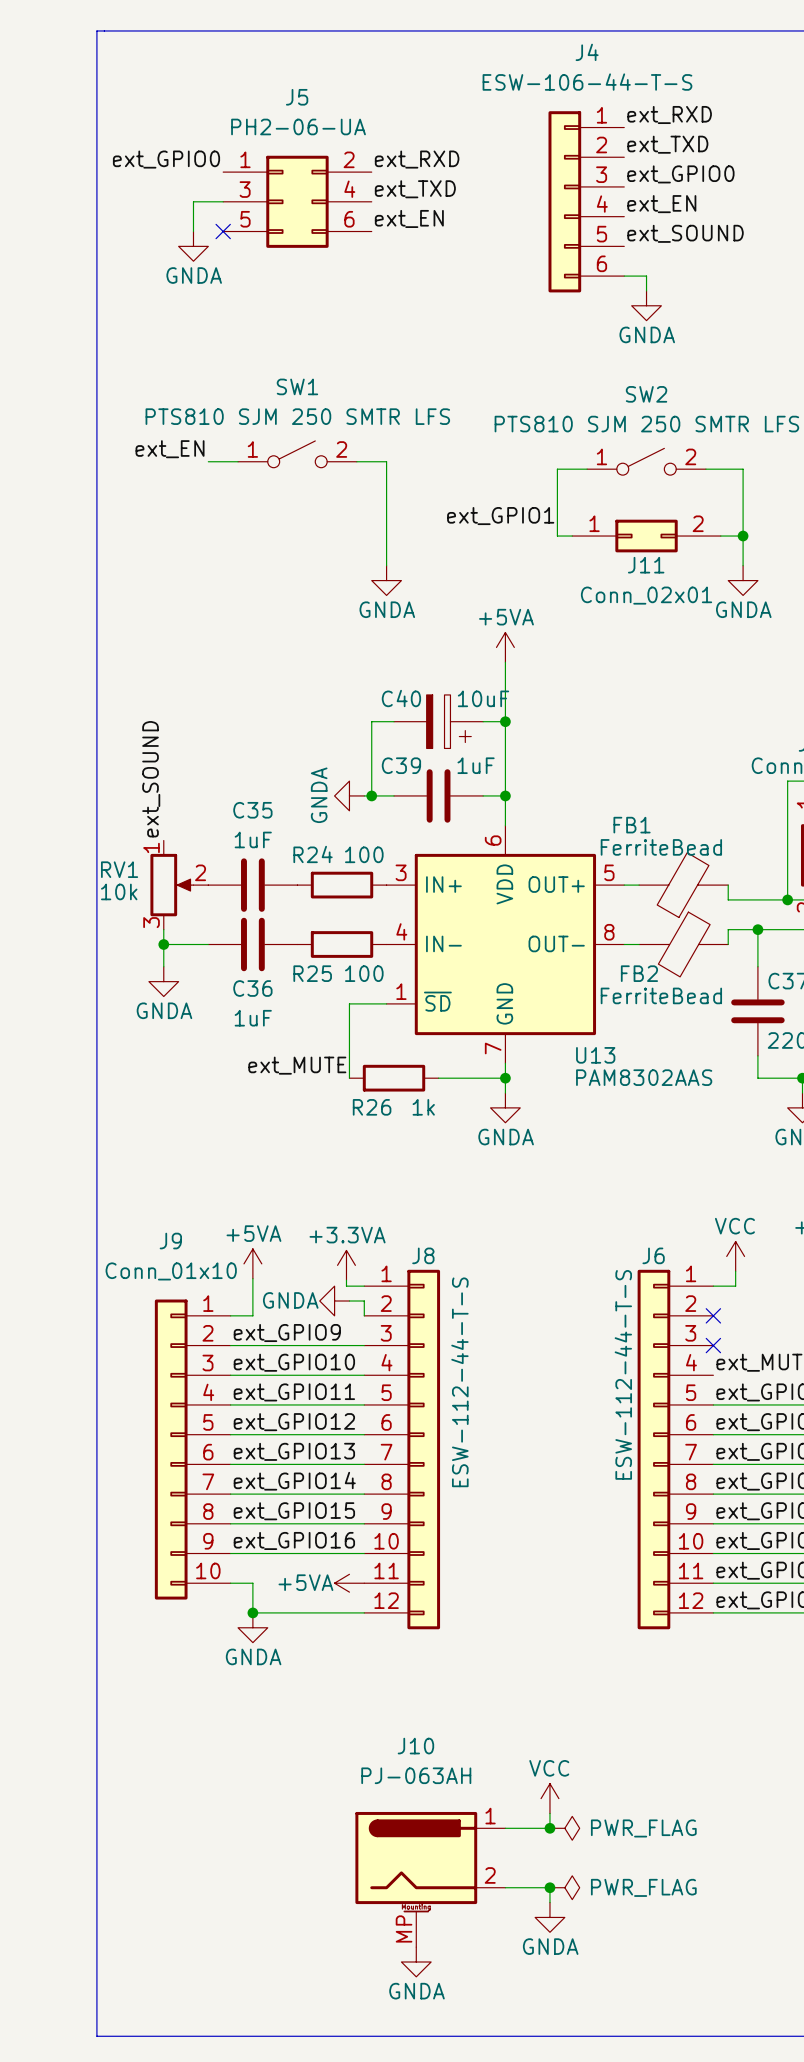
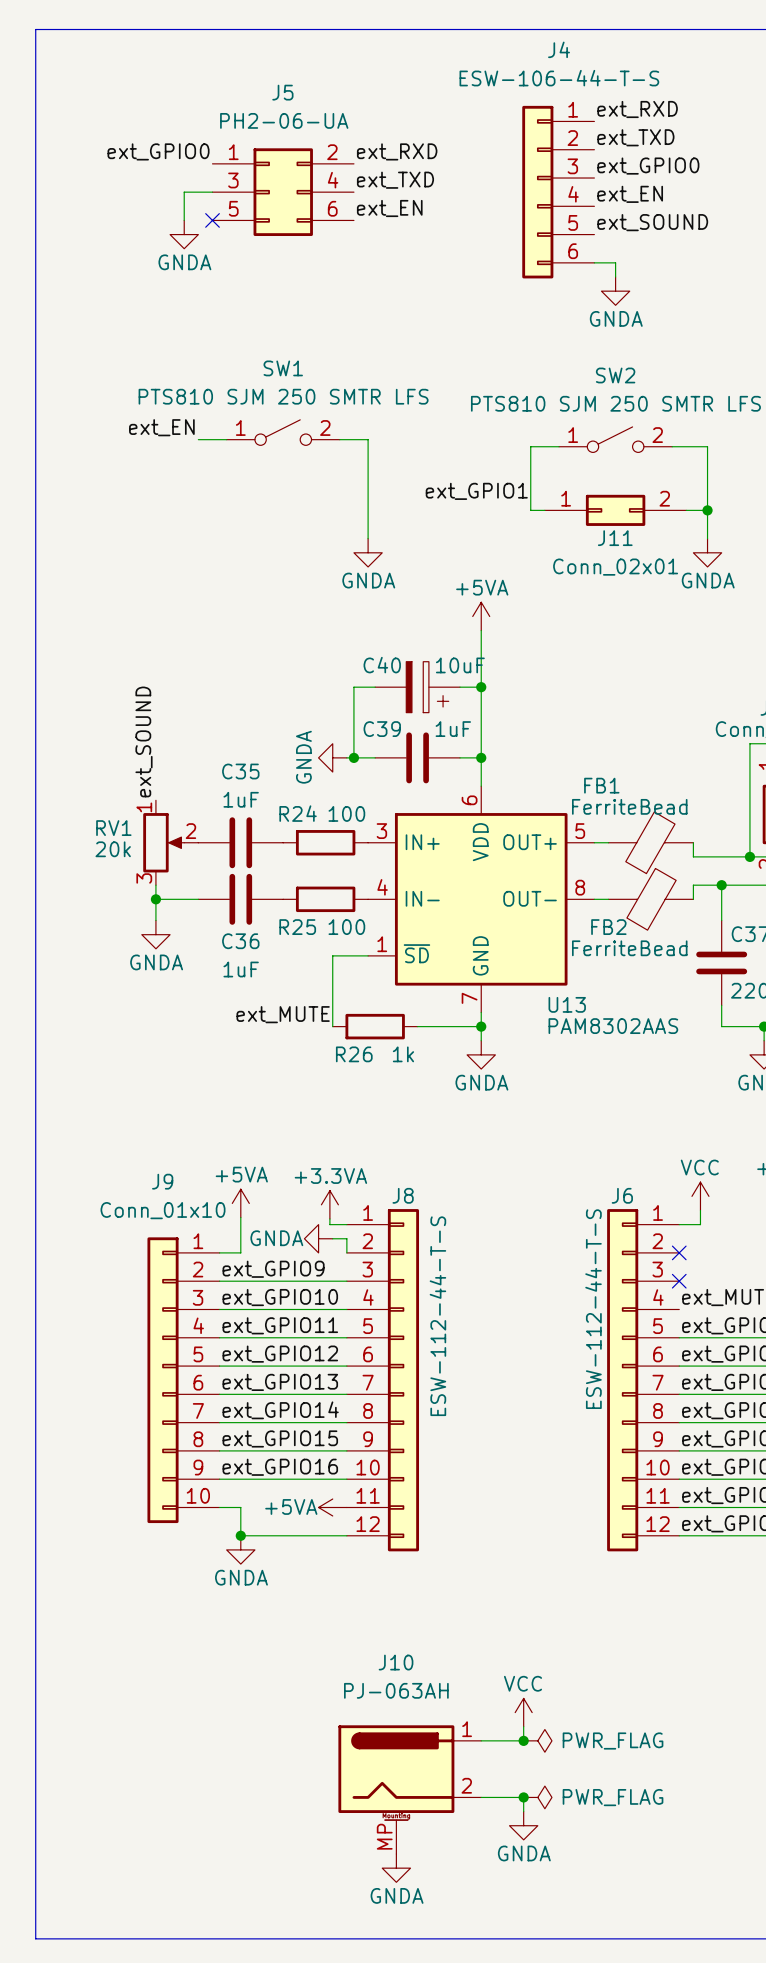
line: (96, 30) (96, 2036) -> (92, 29) (35, 29) (35, 1938) (92, 1938)
RV1 value: 10k (119, 891) -> 20k (113, 849)

